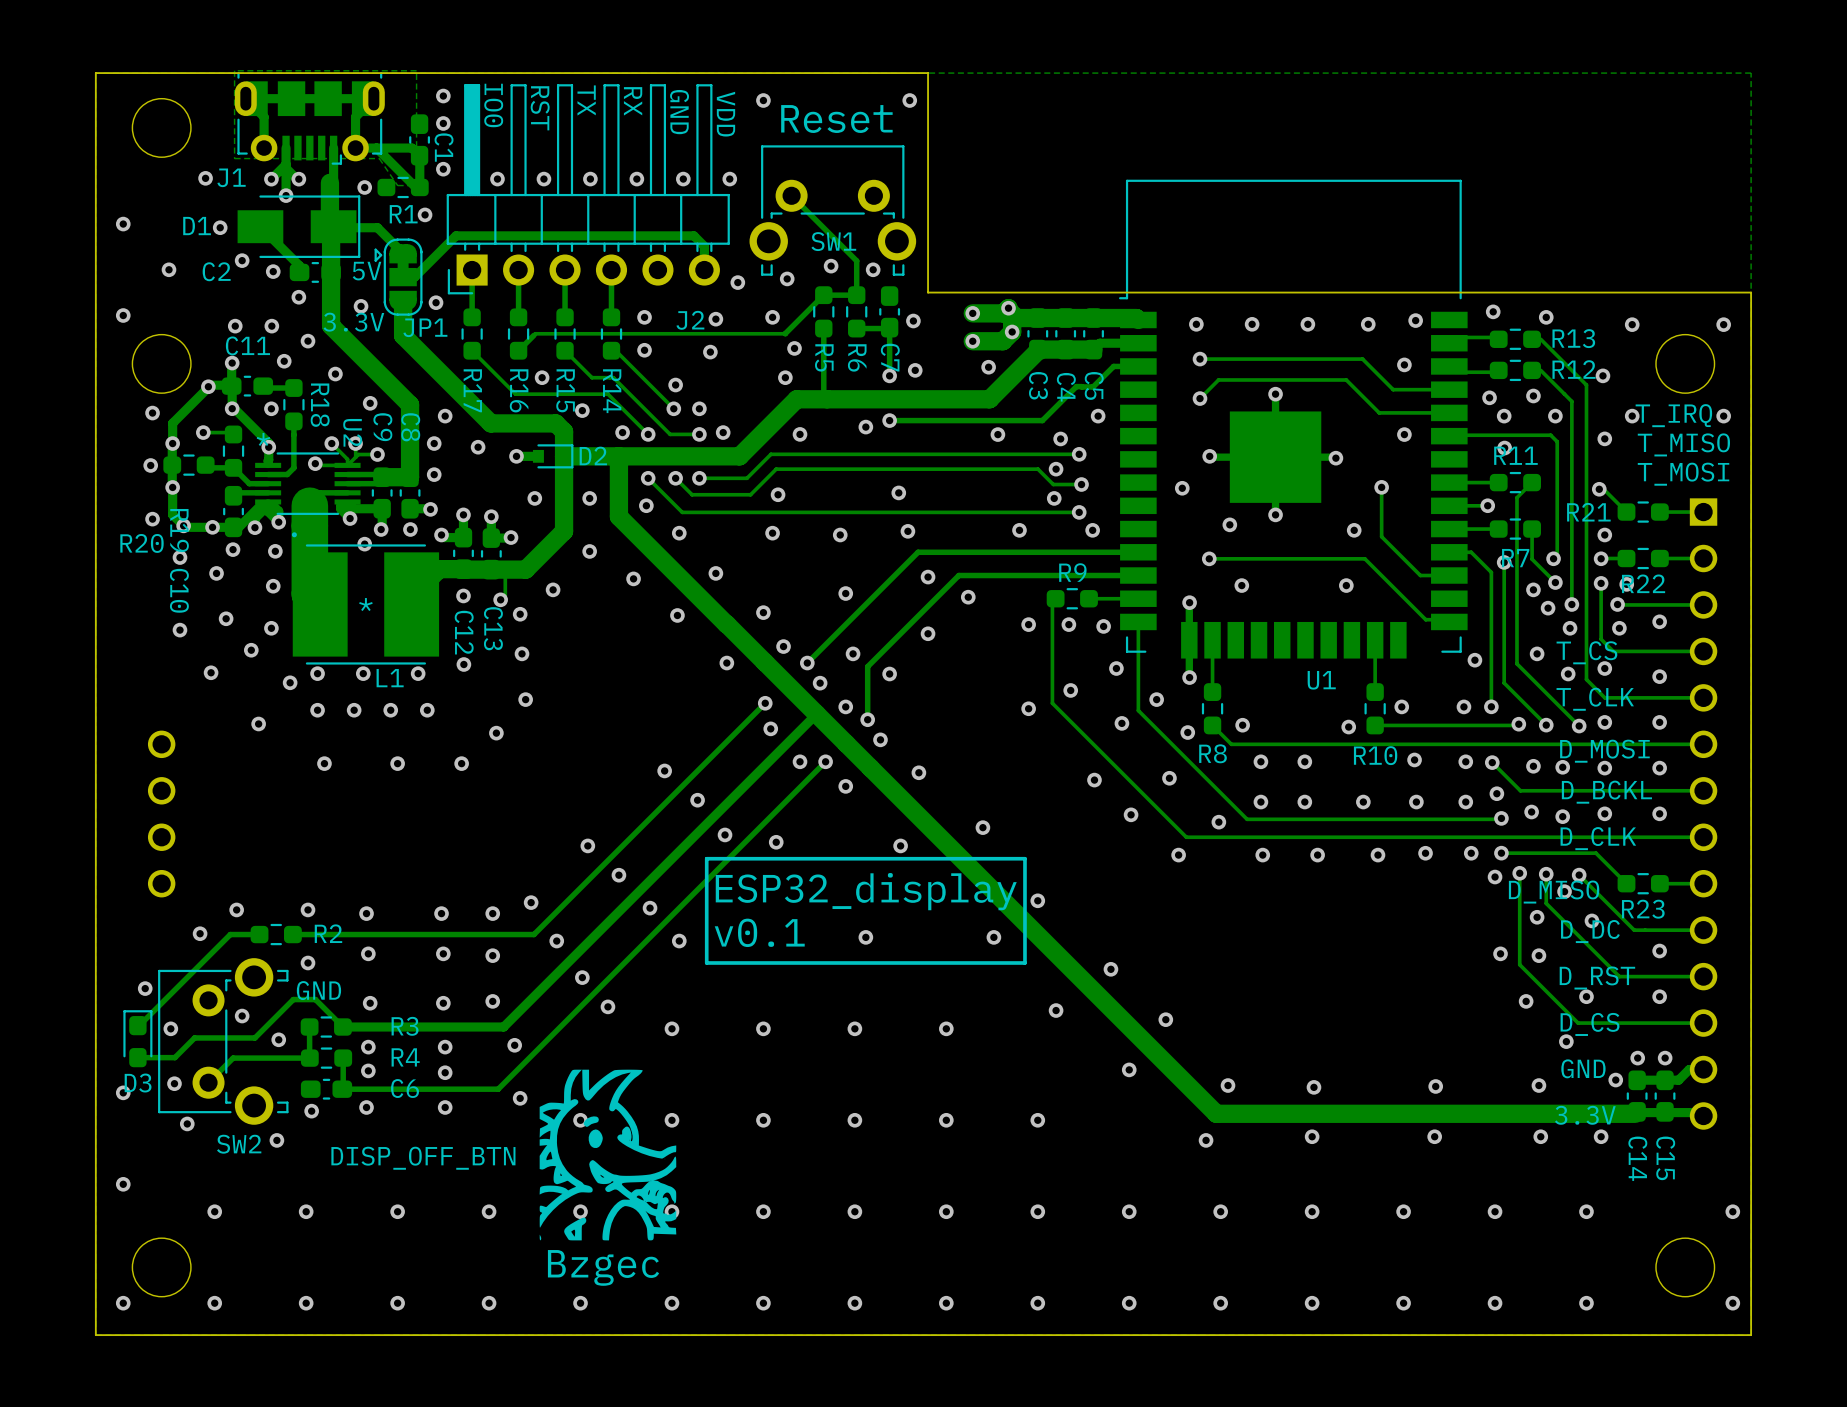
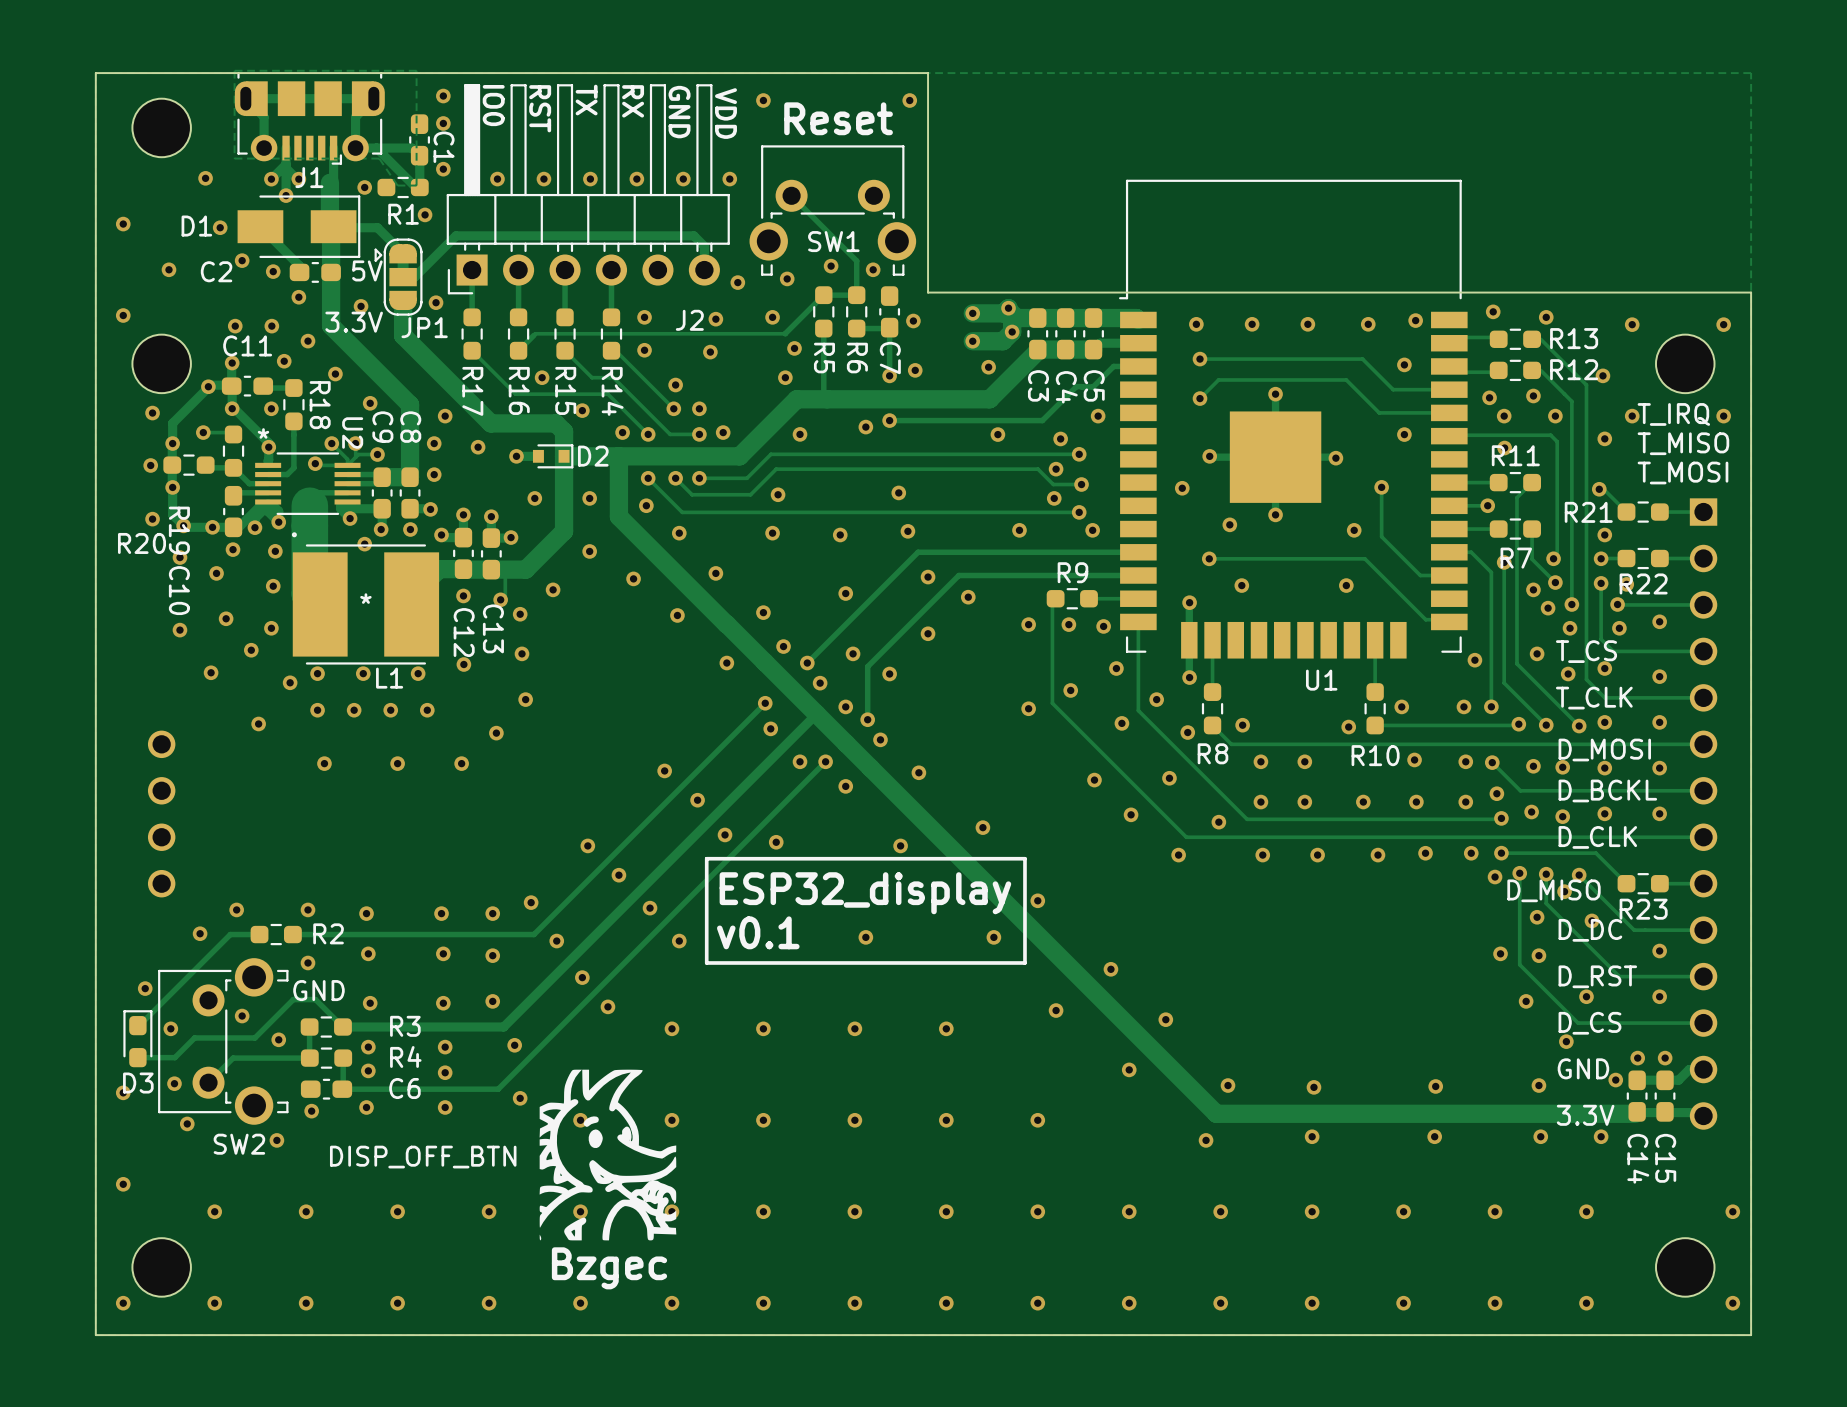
J1 name position: J1 (231, 177) -> J1 (309, 177)

